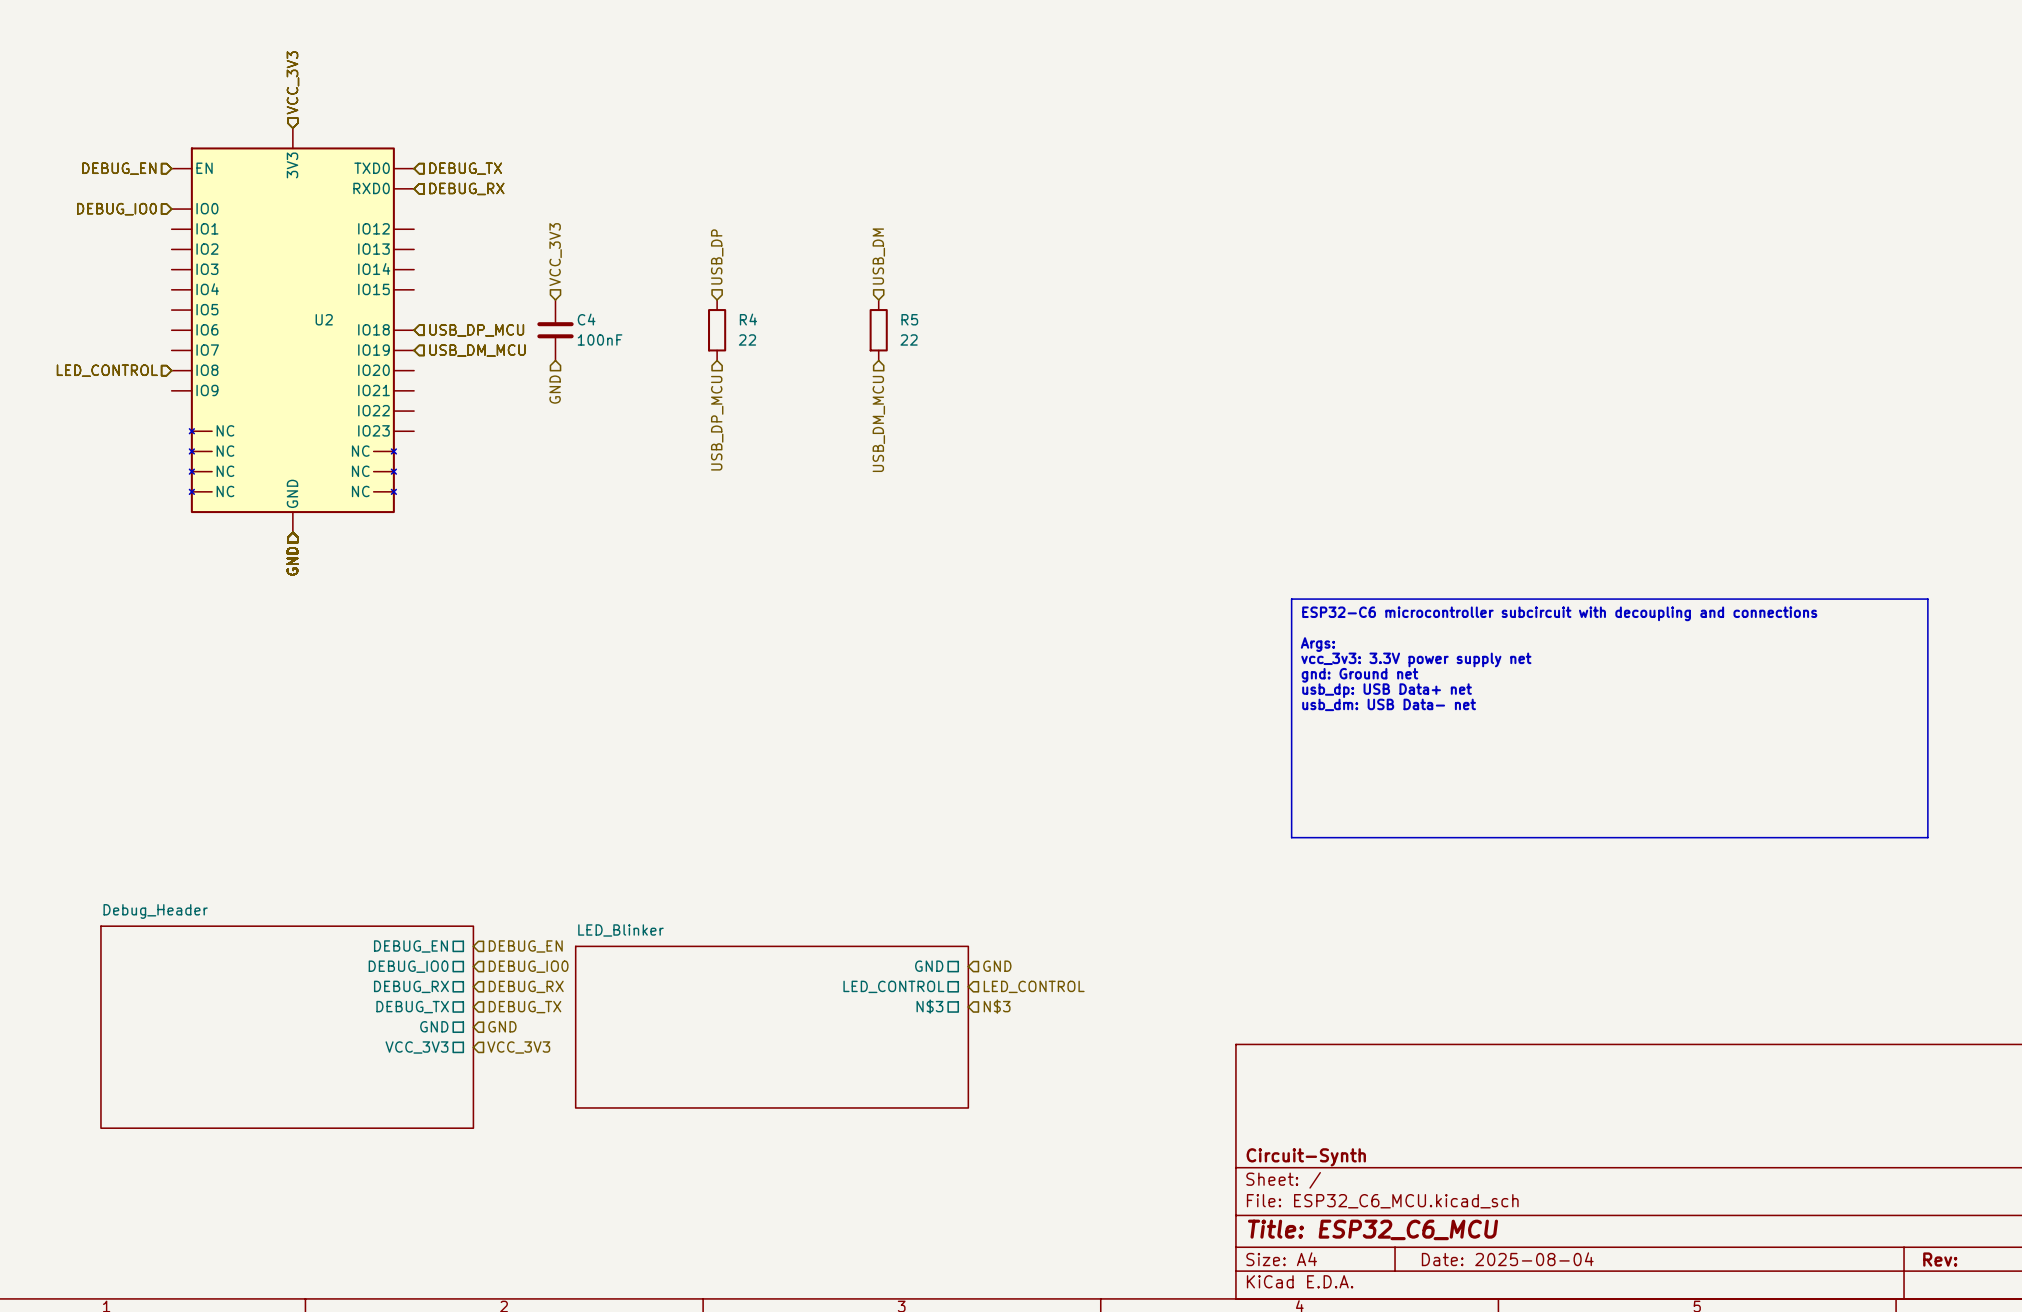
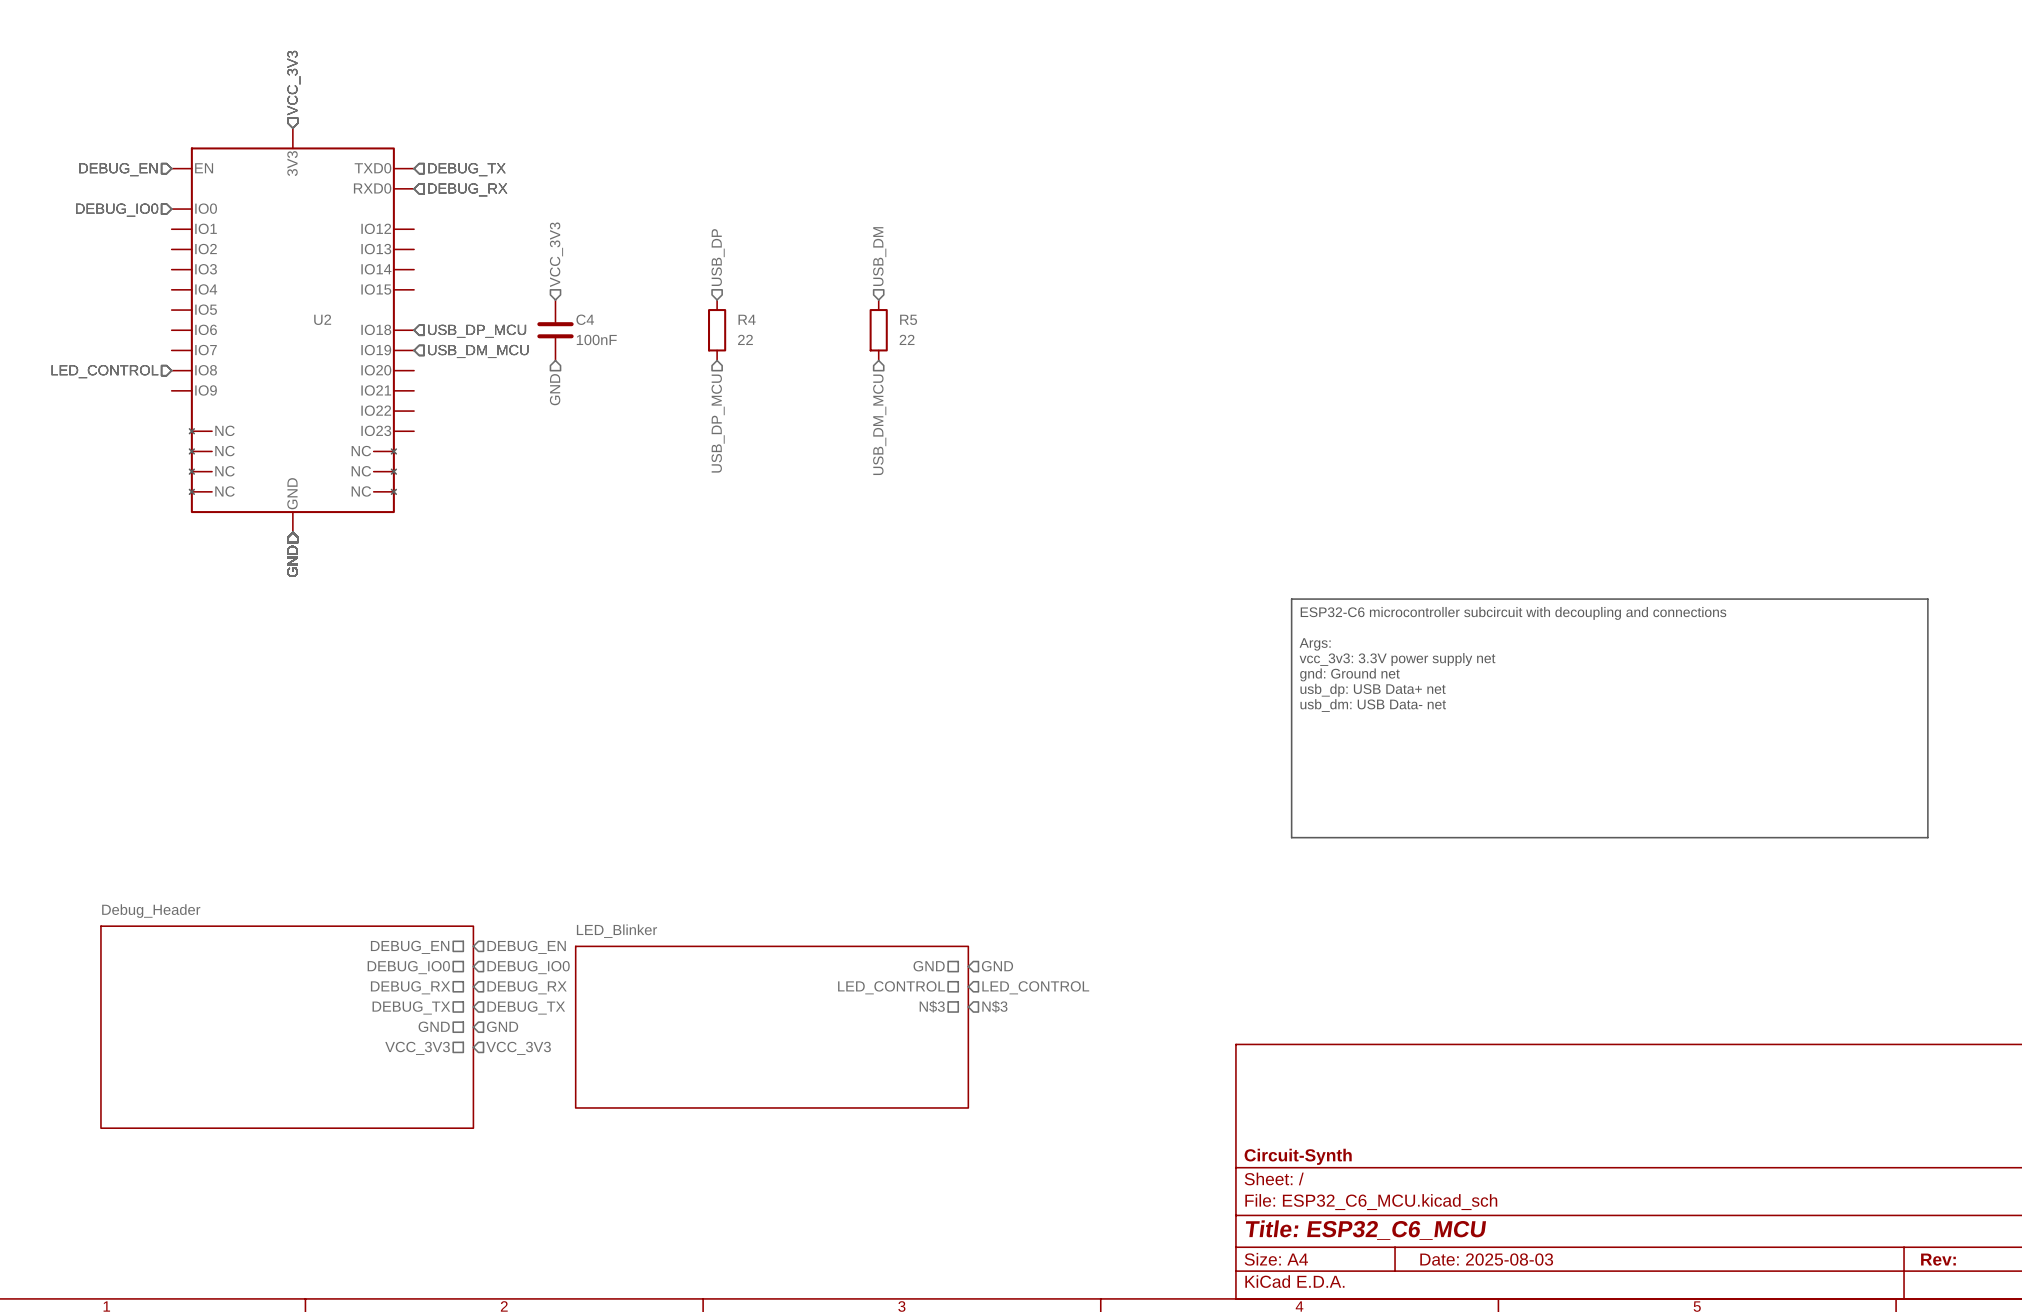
title block: Date: 2025-08-04 (1507, 1259) -> Date: 2025-08-03 (1486, 1259)

